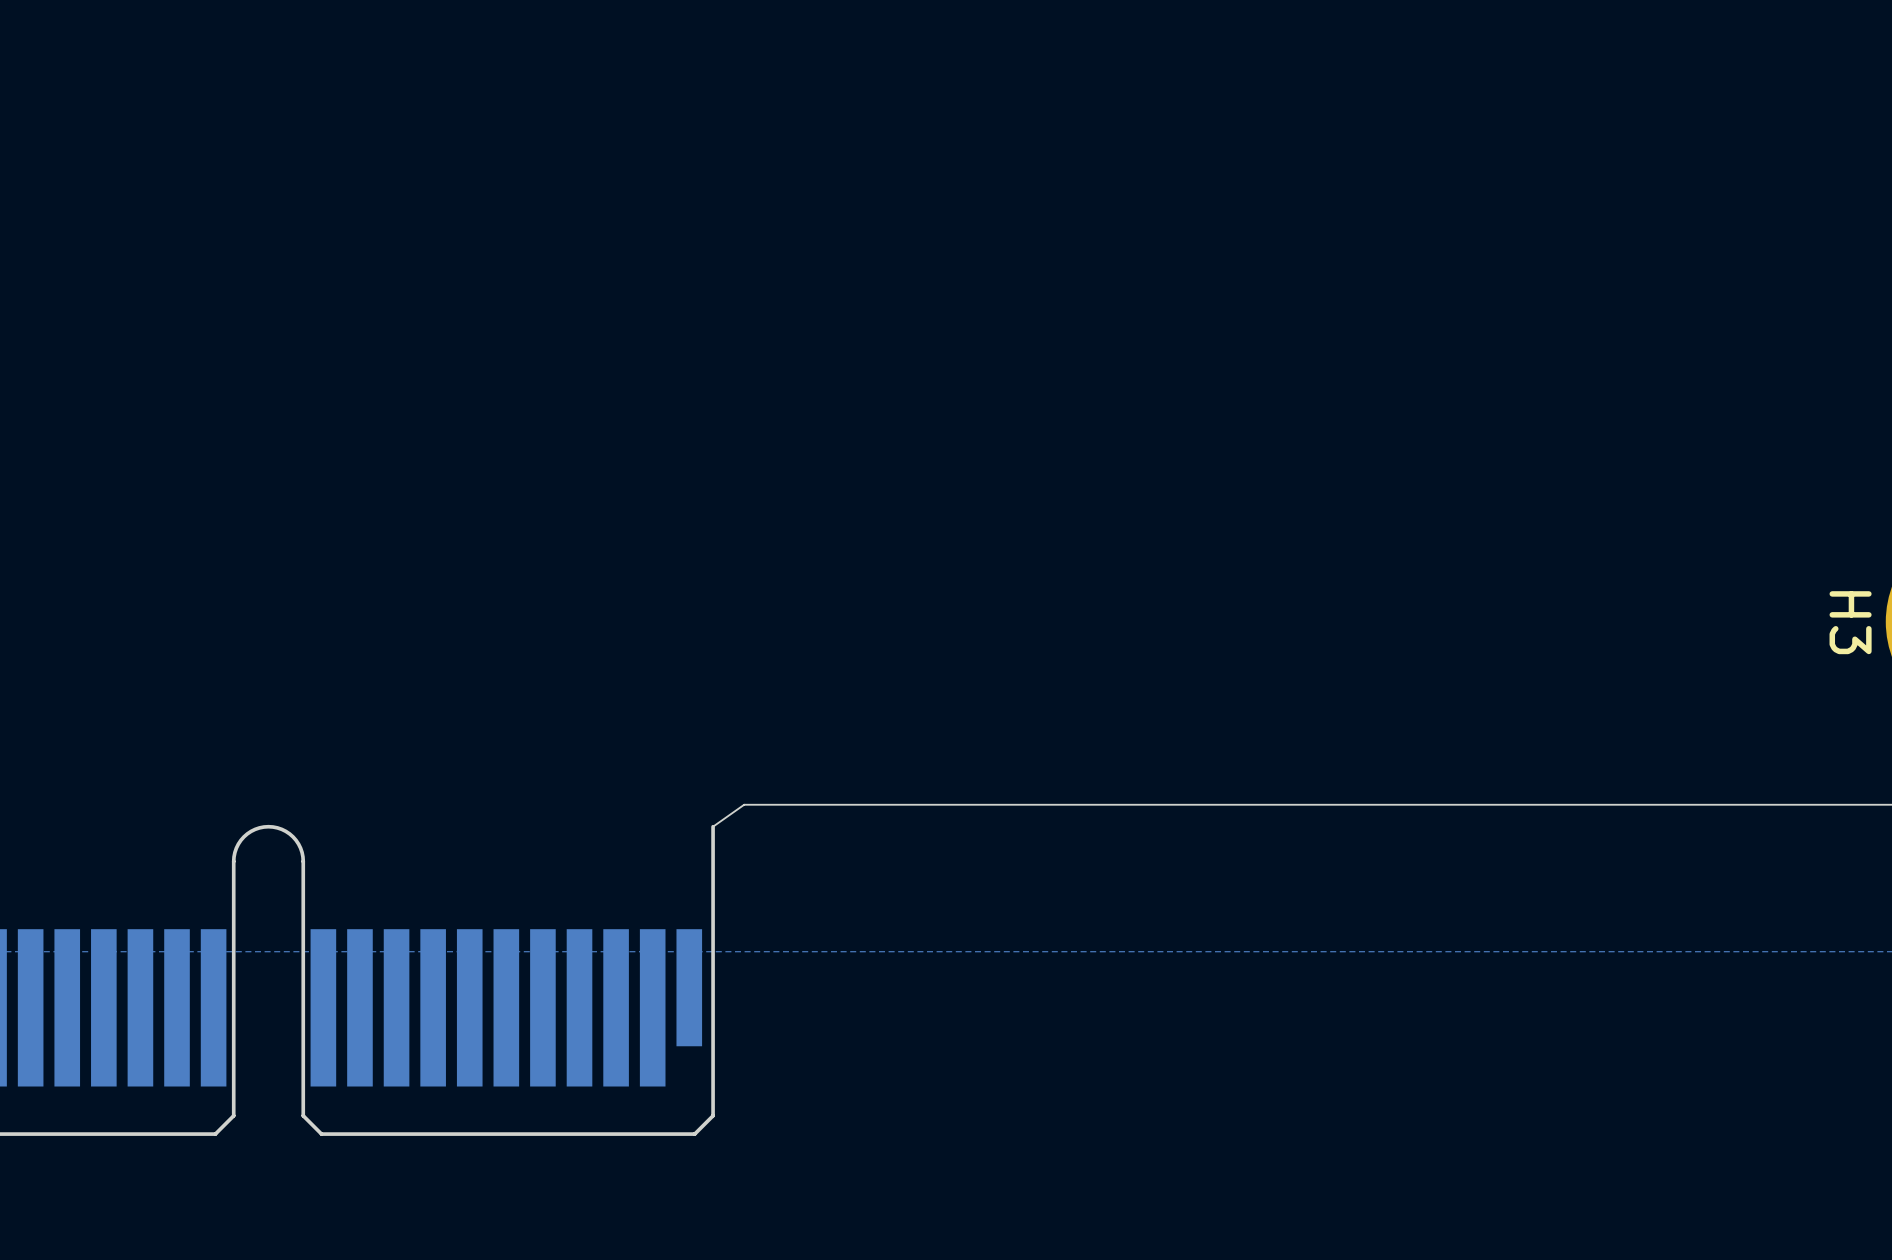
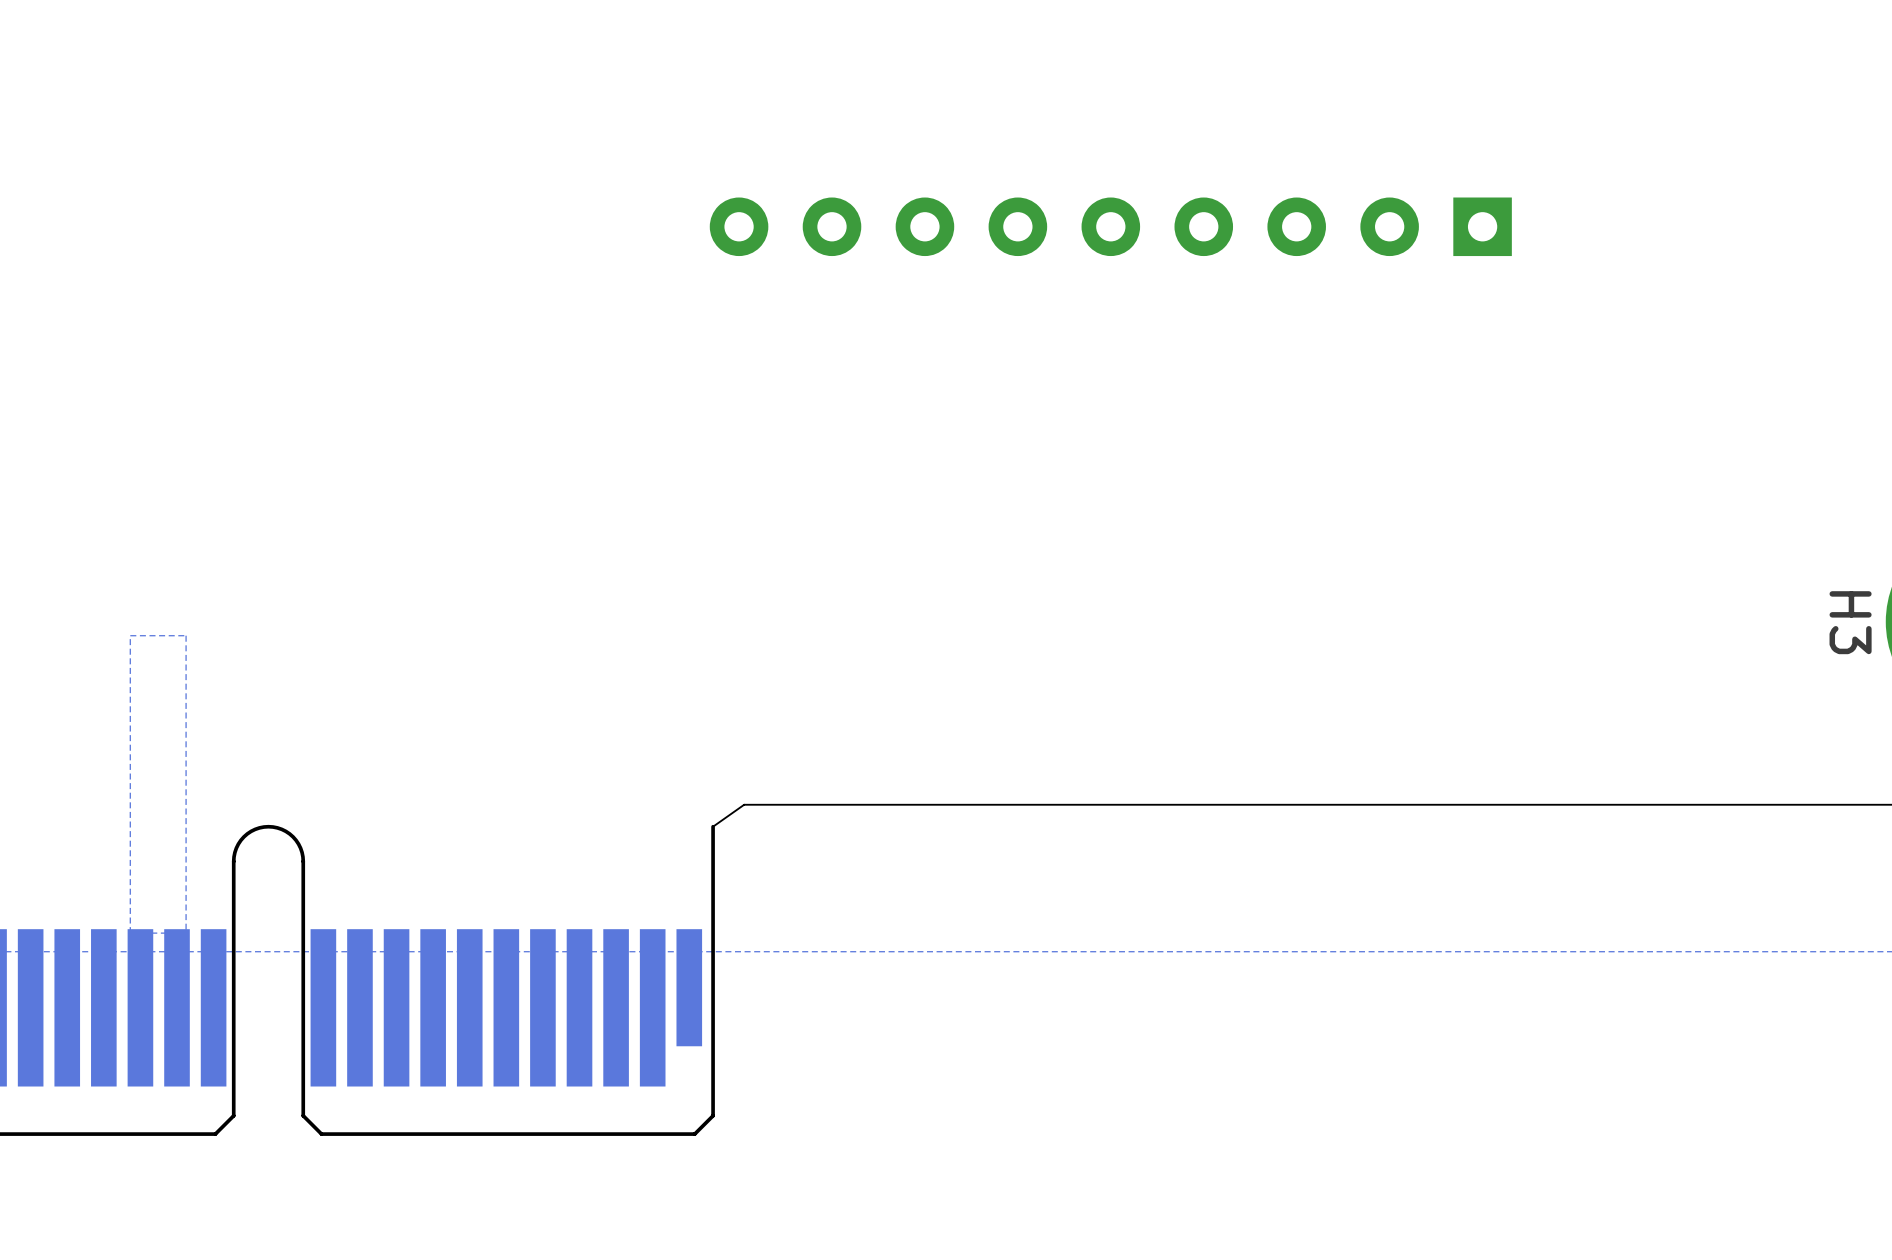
part: none -> (1110, 226)
zone outline: none -> (186, 635) (130, 635) (130, 933) (186, 933) (186, 635)

